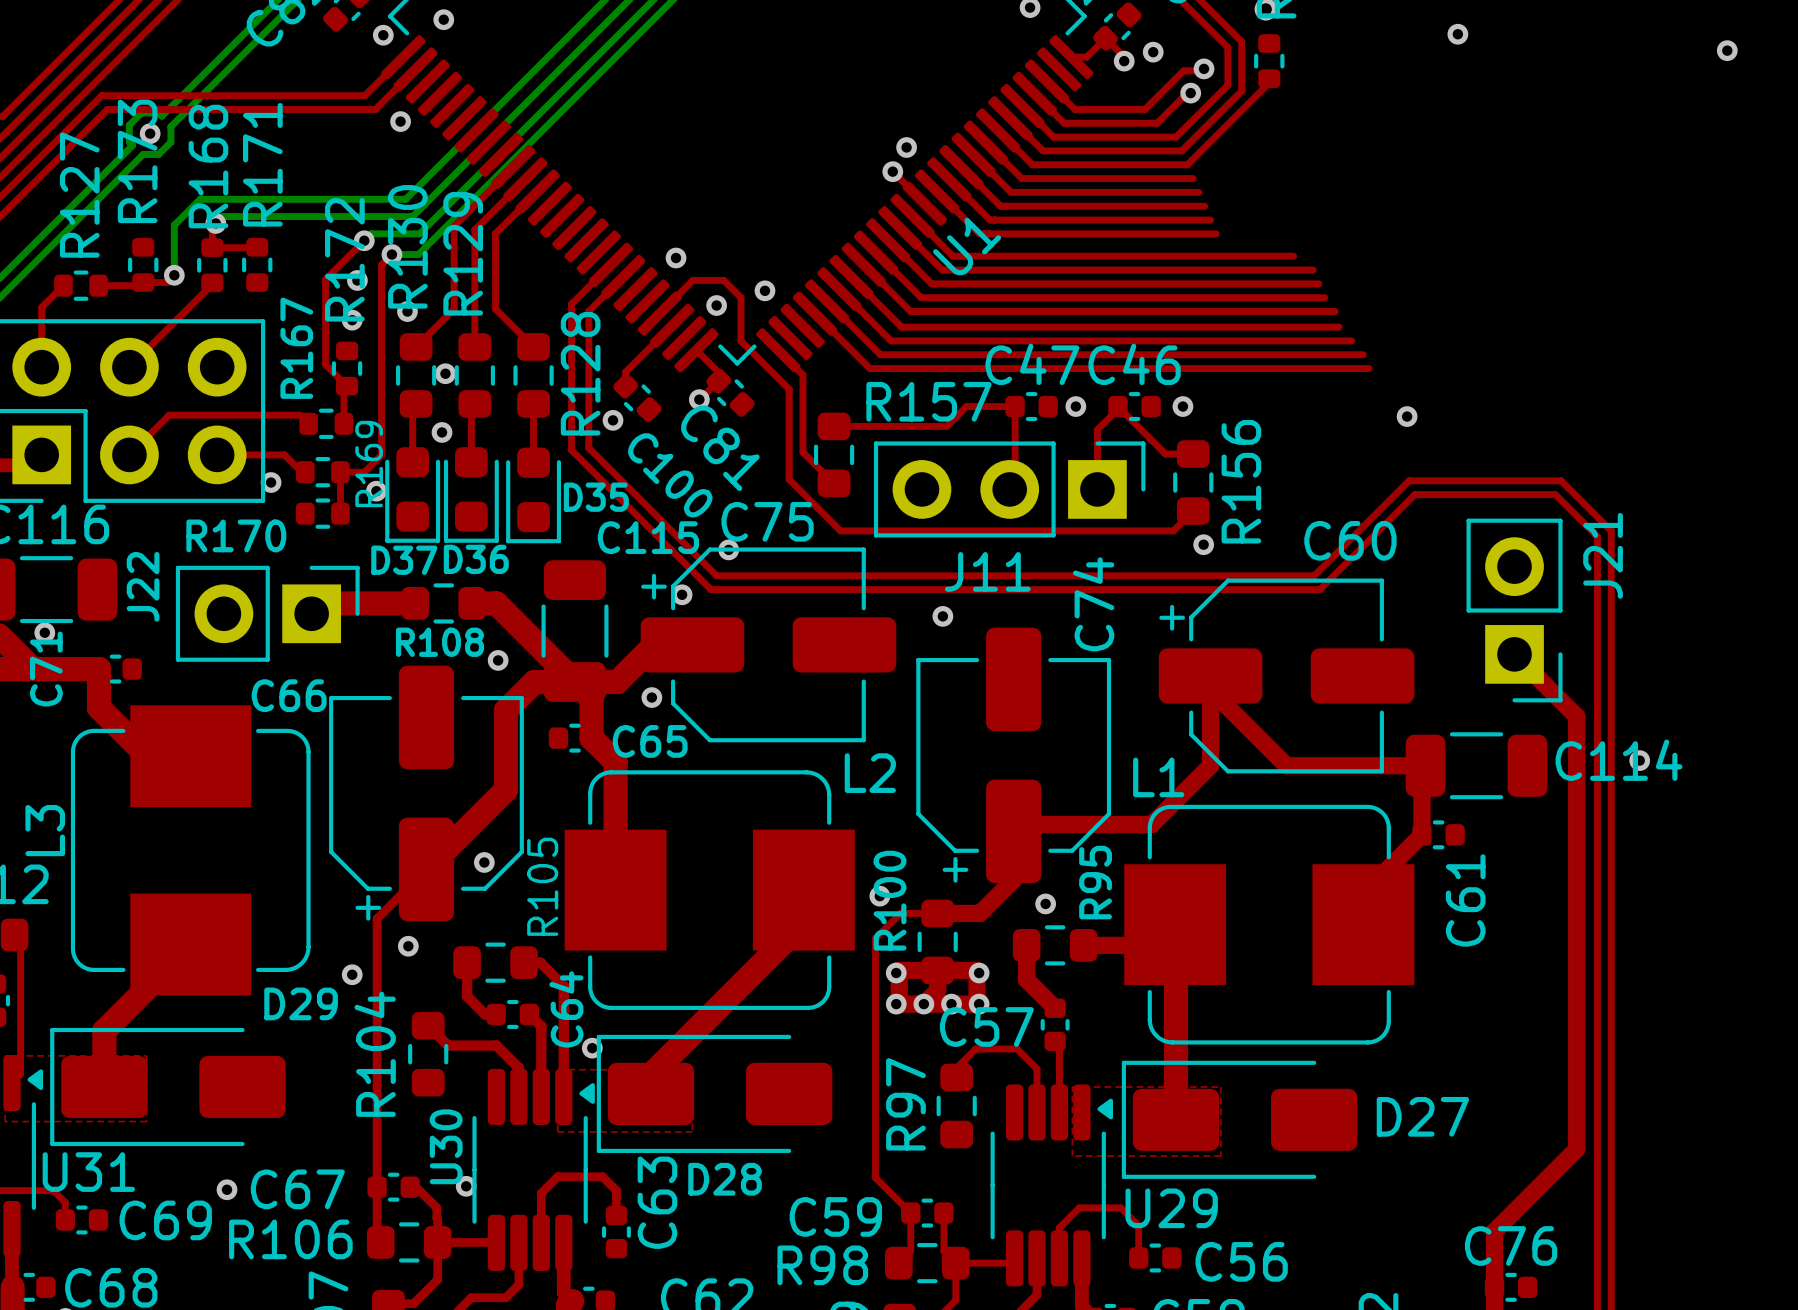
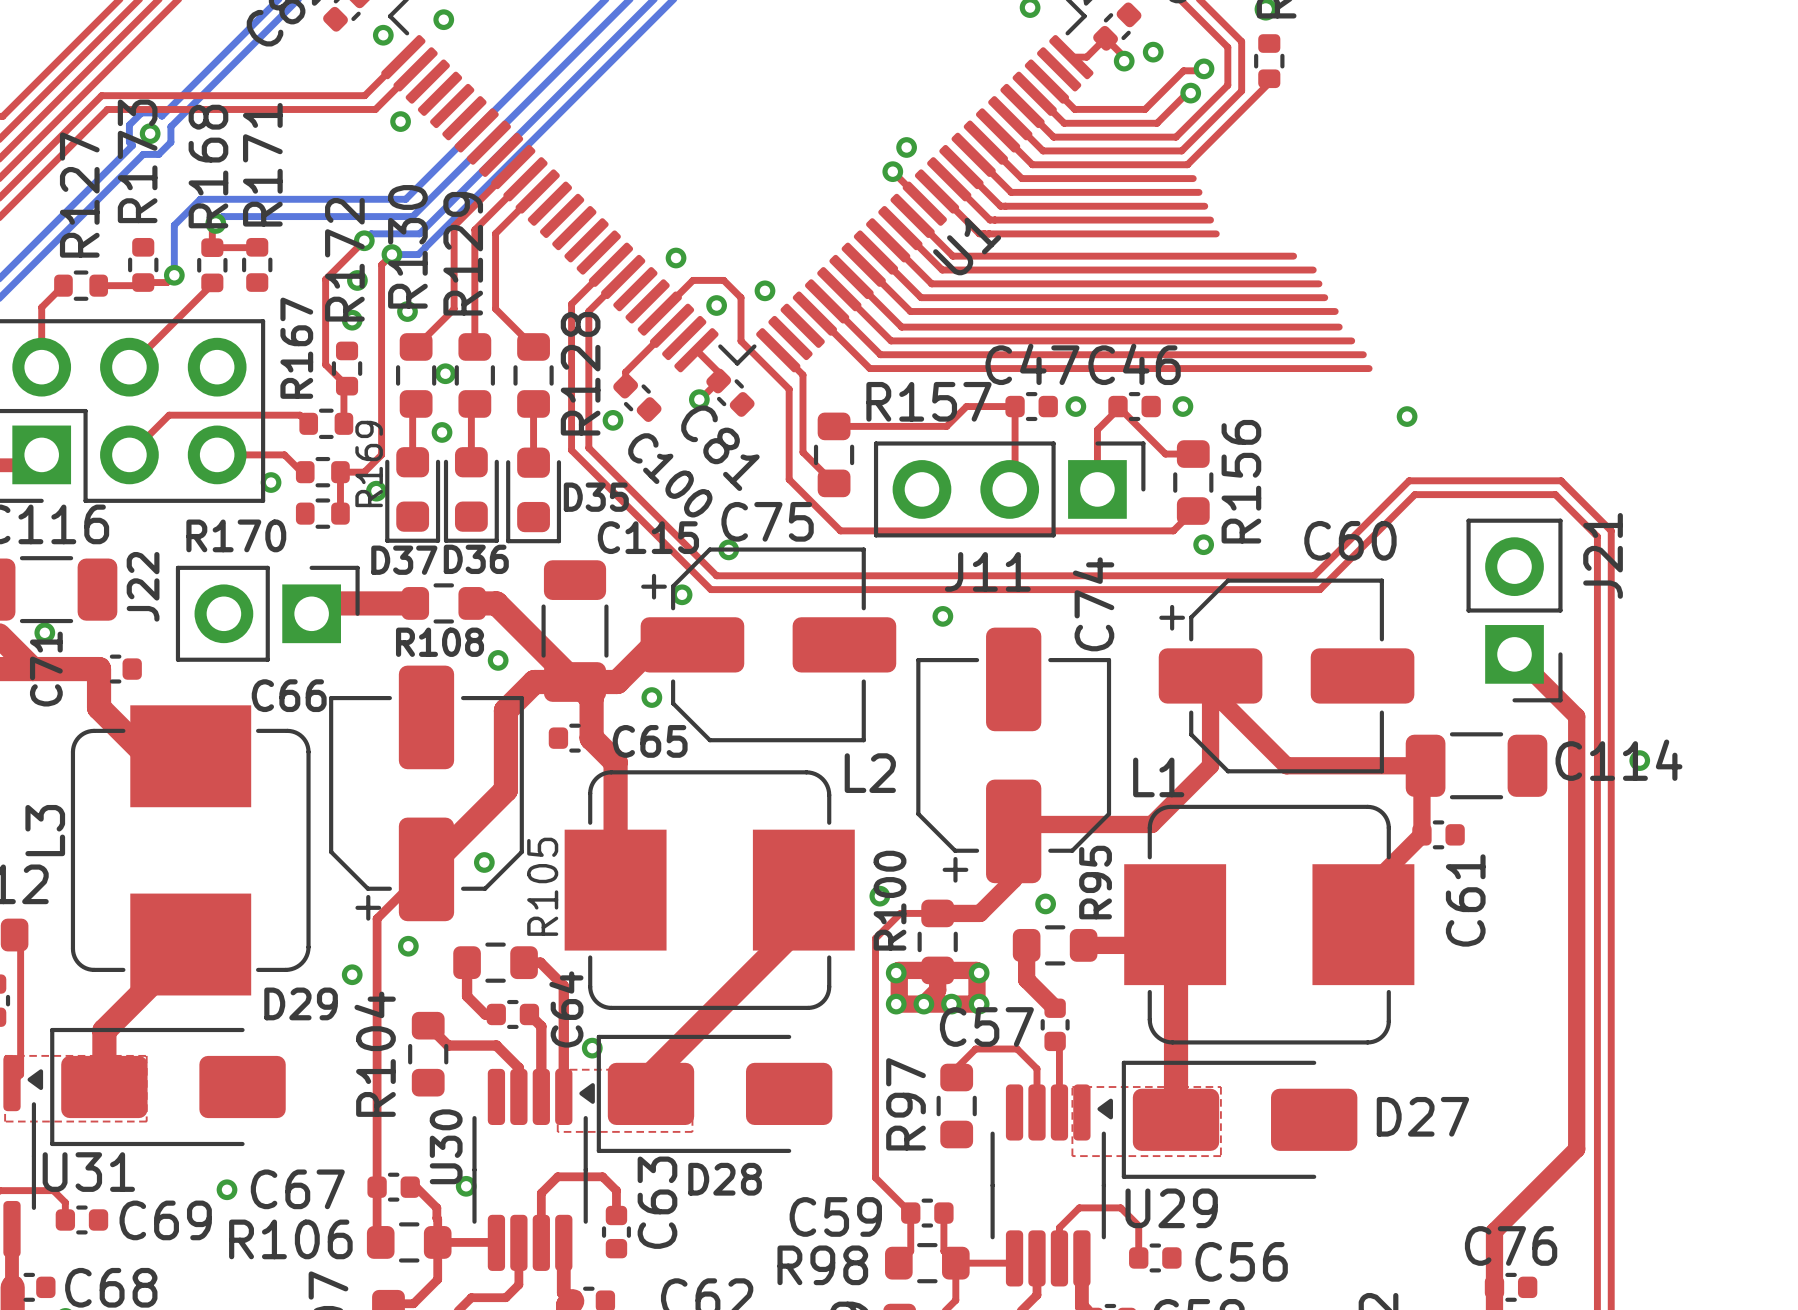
via: (1457, 34) -> none
via: (1727, 50) -> none

